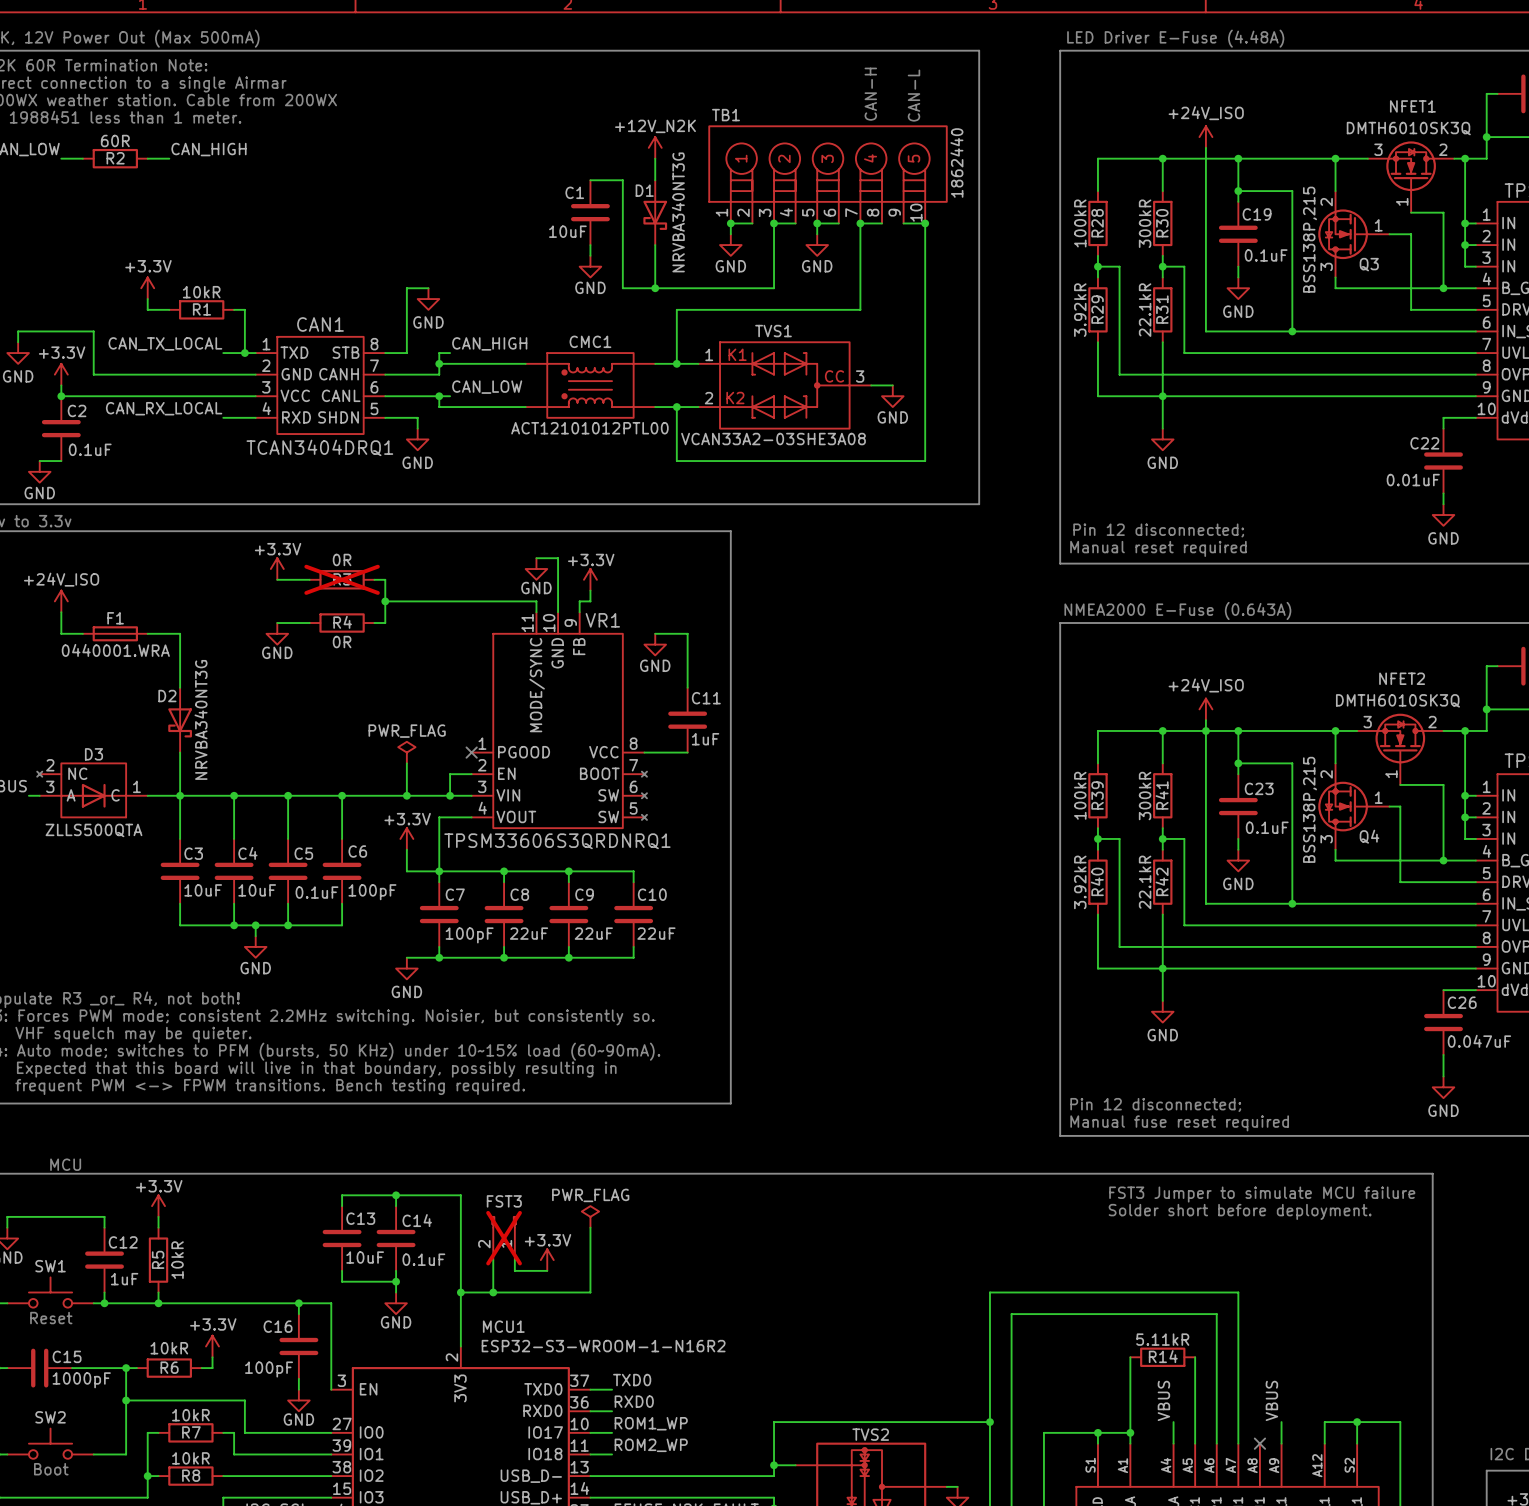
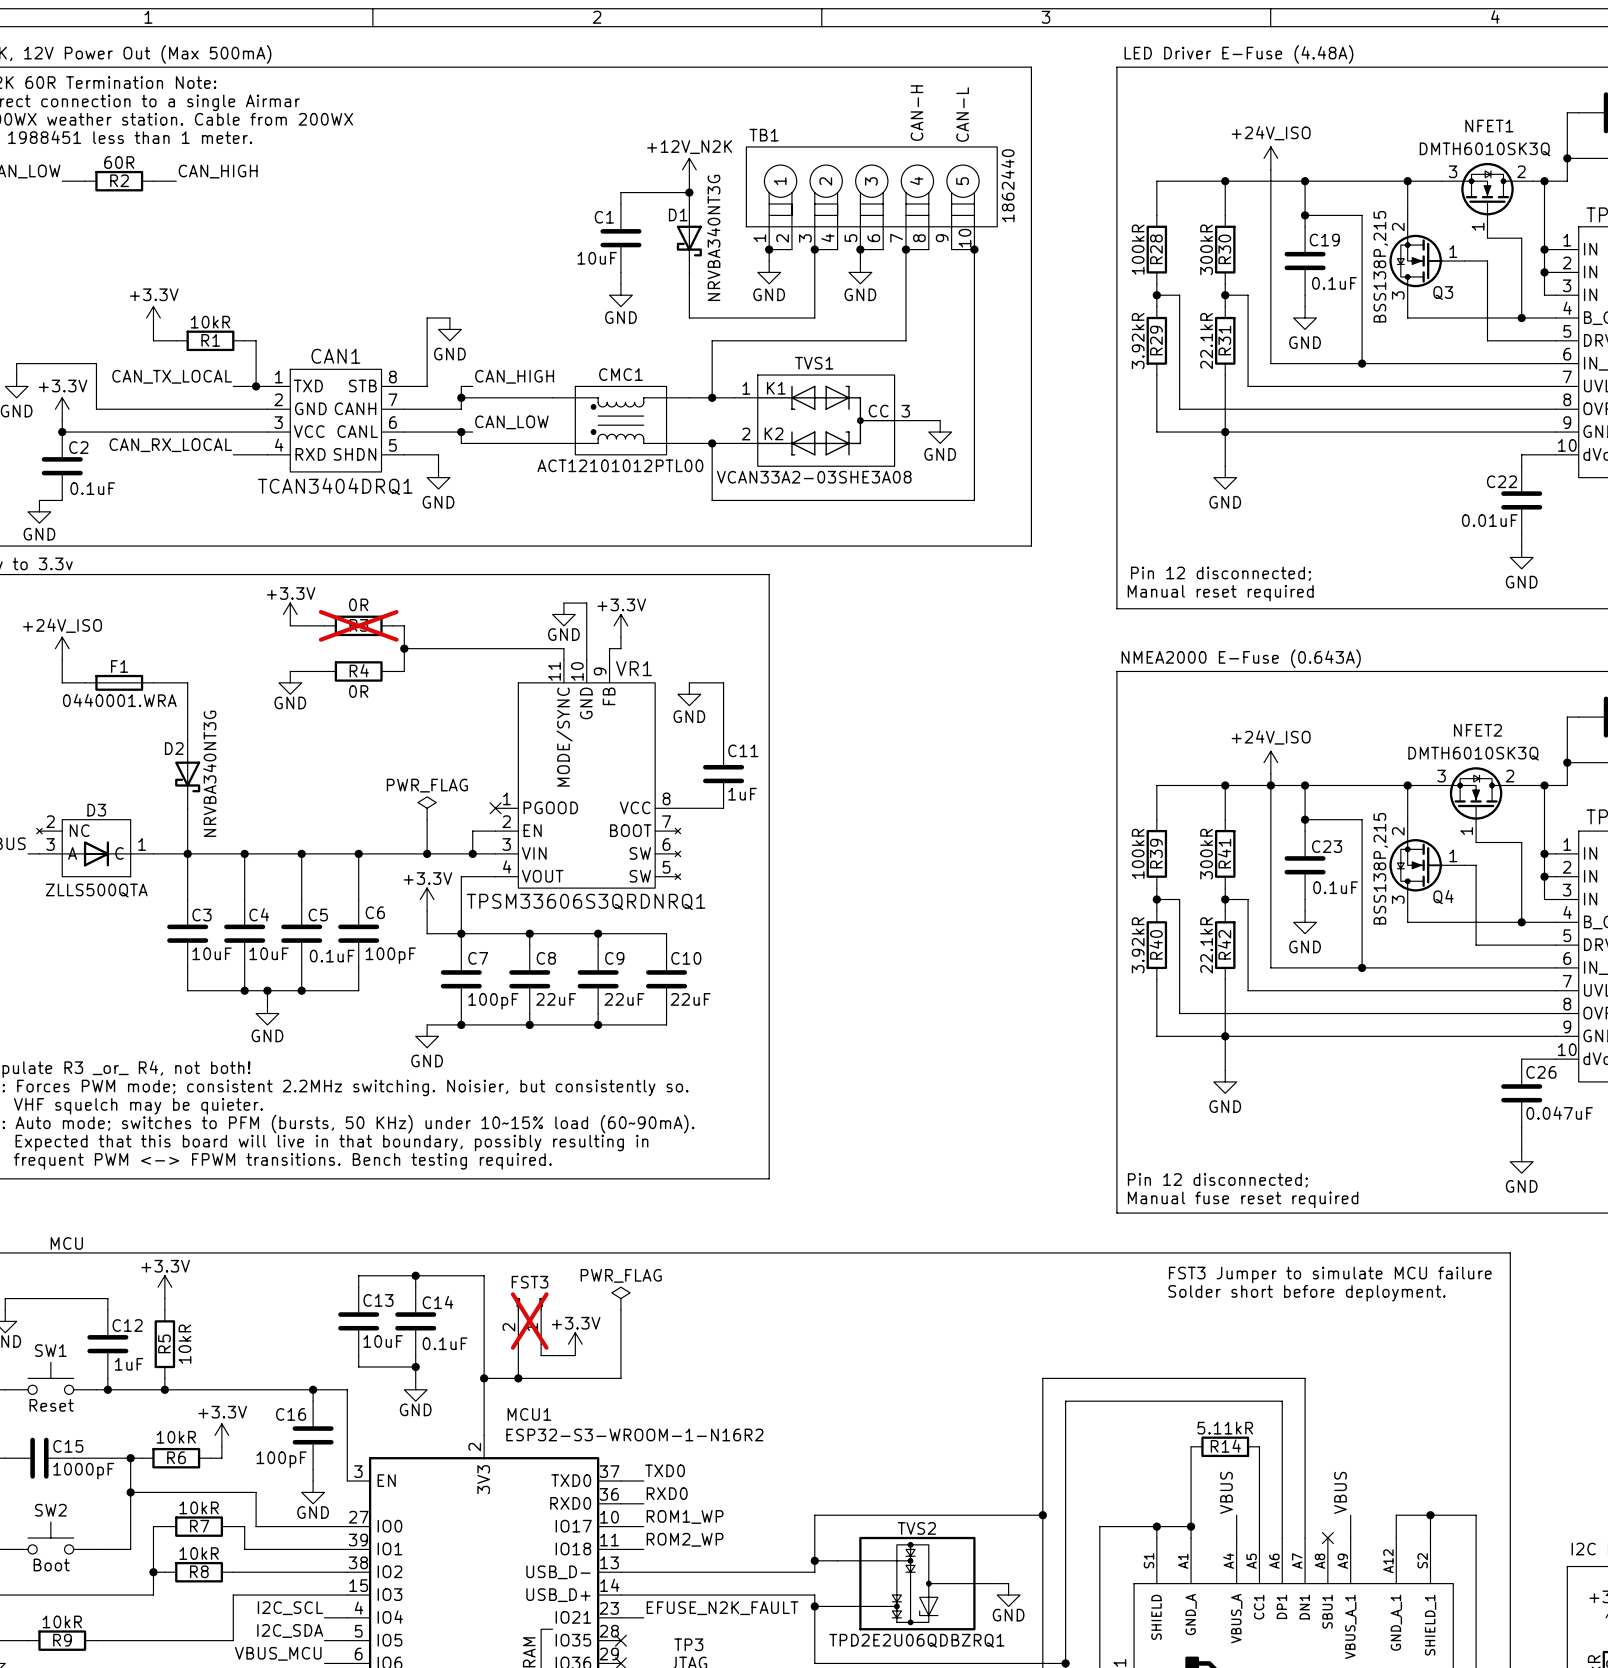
junction: none -> (689, 192)
wire: (590, 180) (622, 180) (622, 288) (655, 288) -> (620, 203) (620, 192) (689, 192)
junction: (655, 288) -> none

